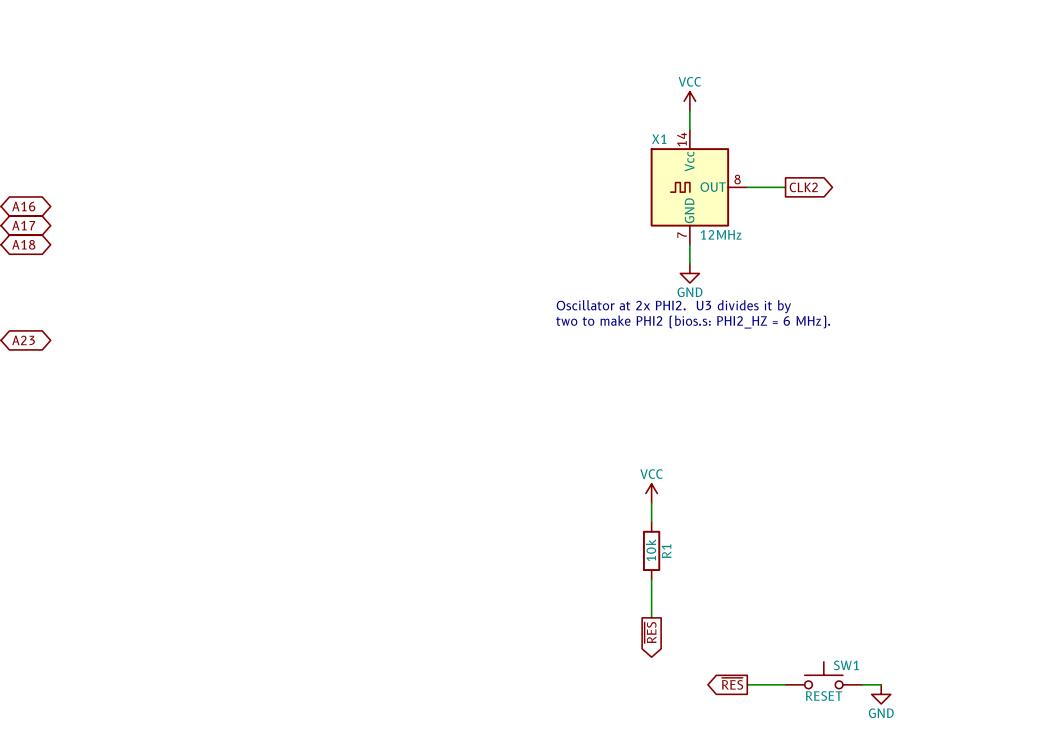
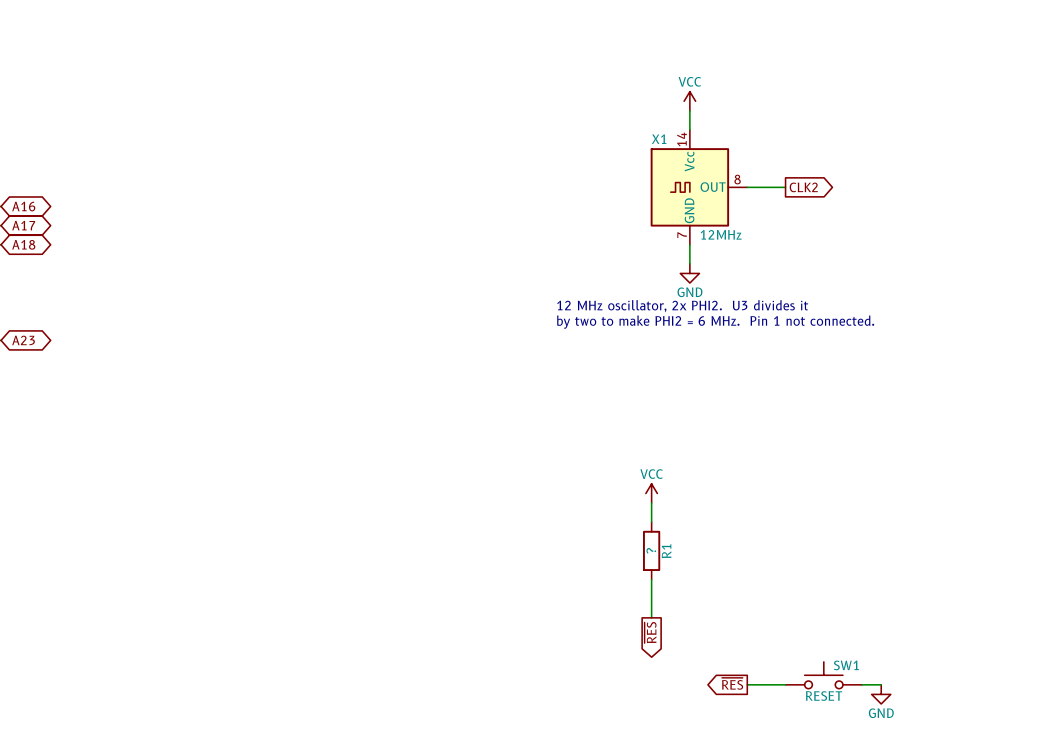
text: Oscillator at 2x PHI2. U3 divides it by (673, 306) -> 12 MHz oscillator, 2x PHI2. U3 divides it (682, 306)
text: two to make PHI2 (bios.s: PHI2_HZ = 6 MHz). (693, 322) -> by two to make PHI2 = 6 MHz. Pin 1 not connected. (715, 322)
R1 value: 10k (650, 550) -> ? (651, 550)

